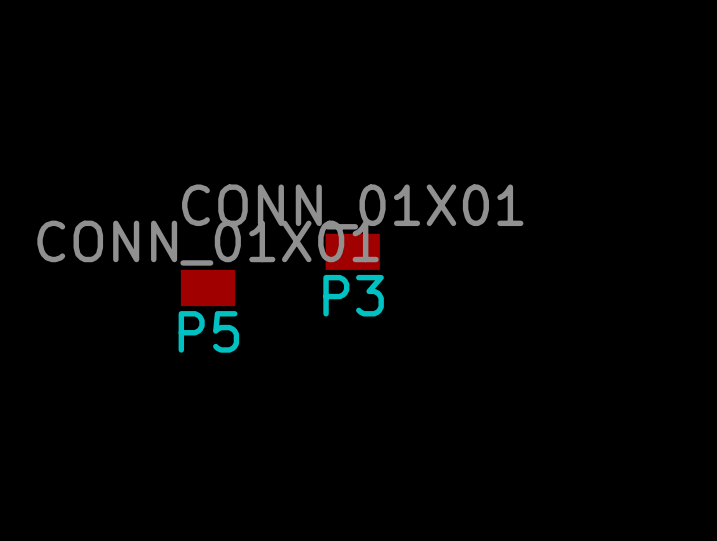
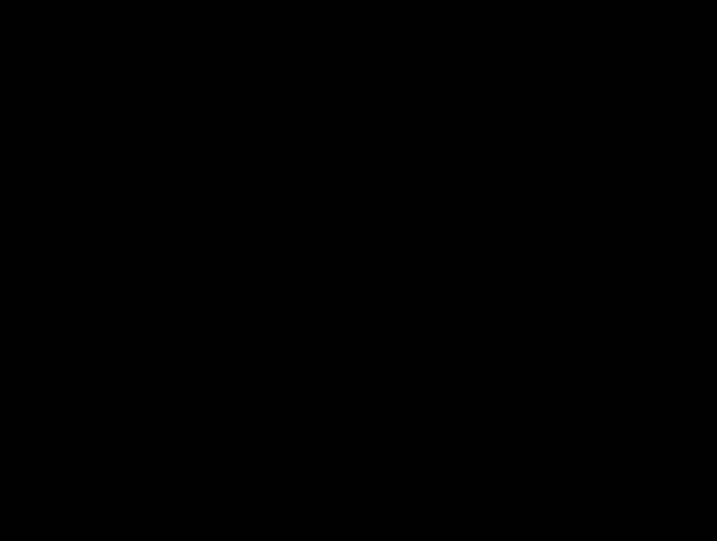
P3: CONN_01X01 (352, 251) -> none
P5: CONN_01X01 (208, 288) -> none

